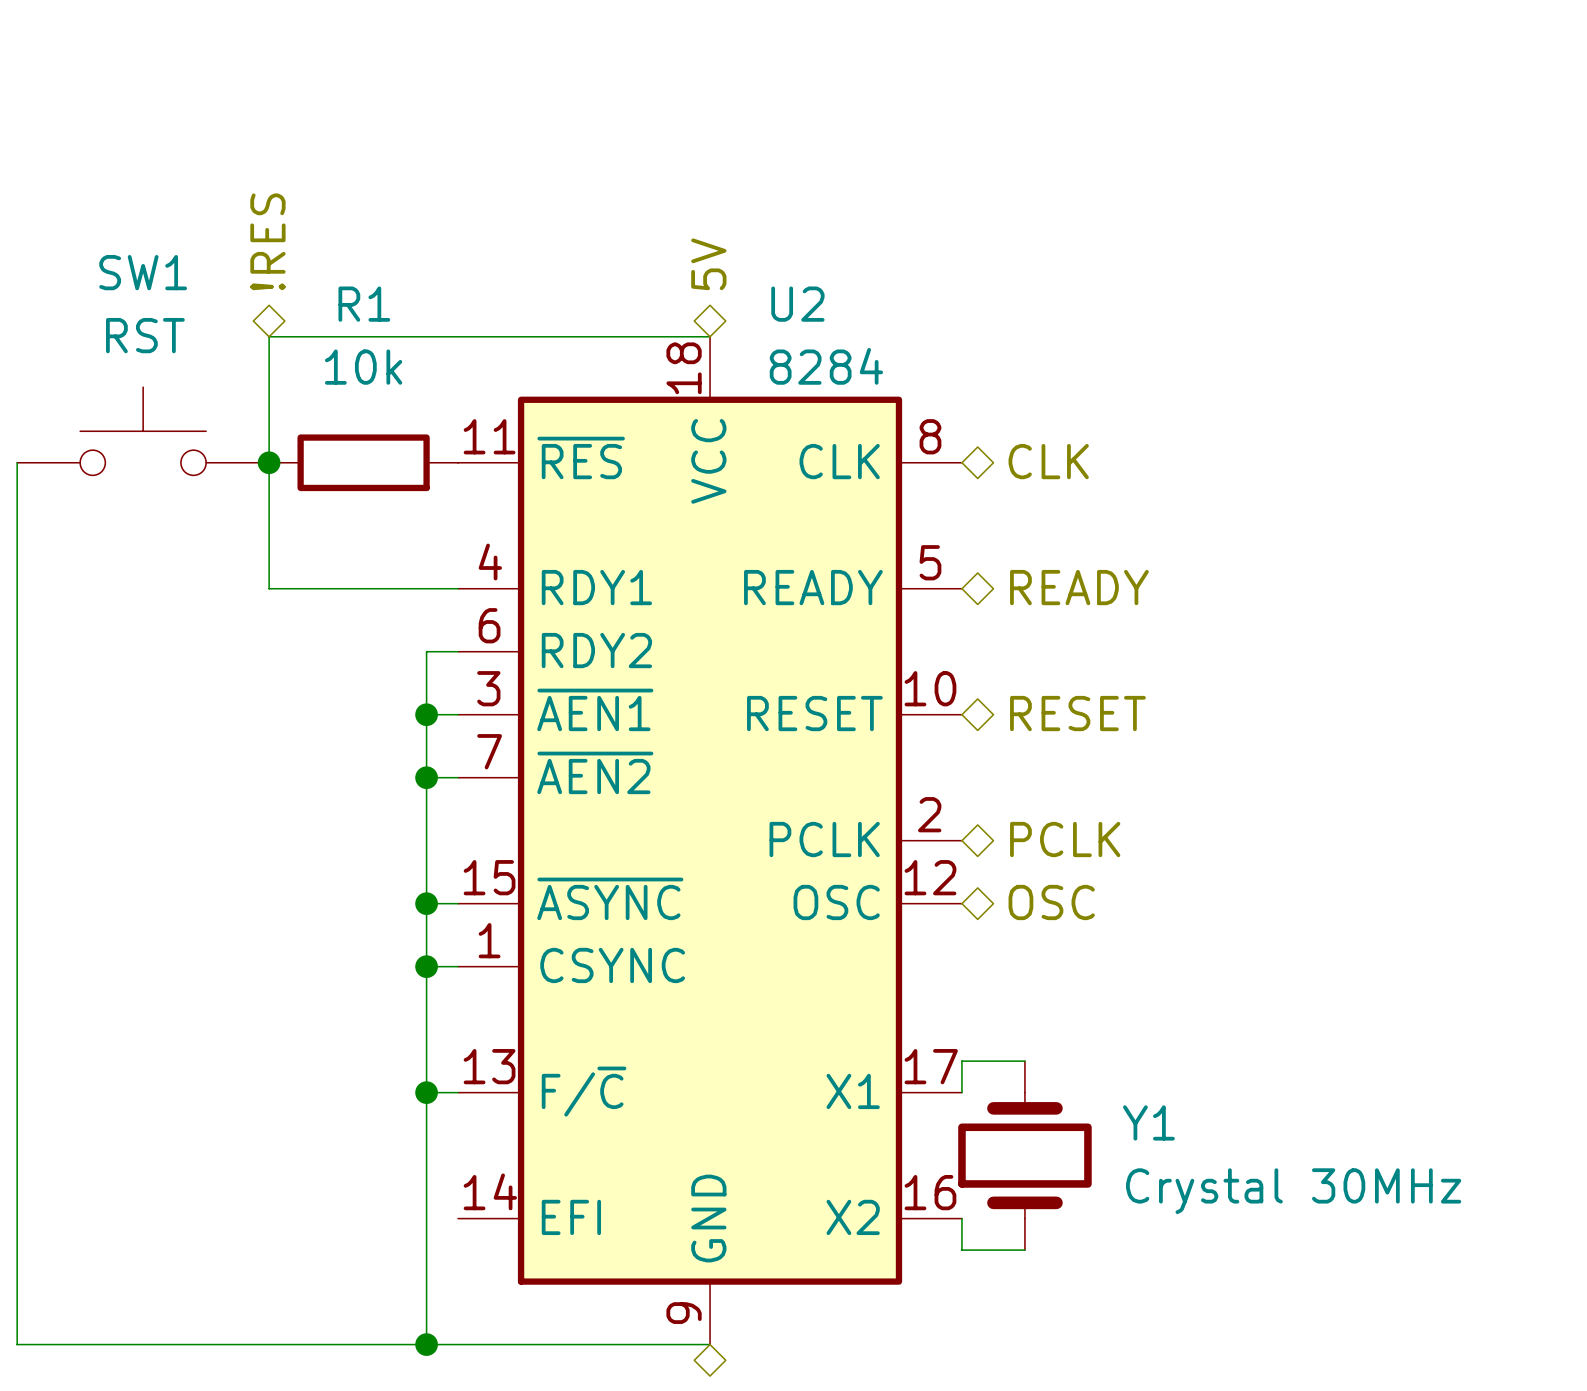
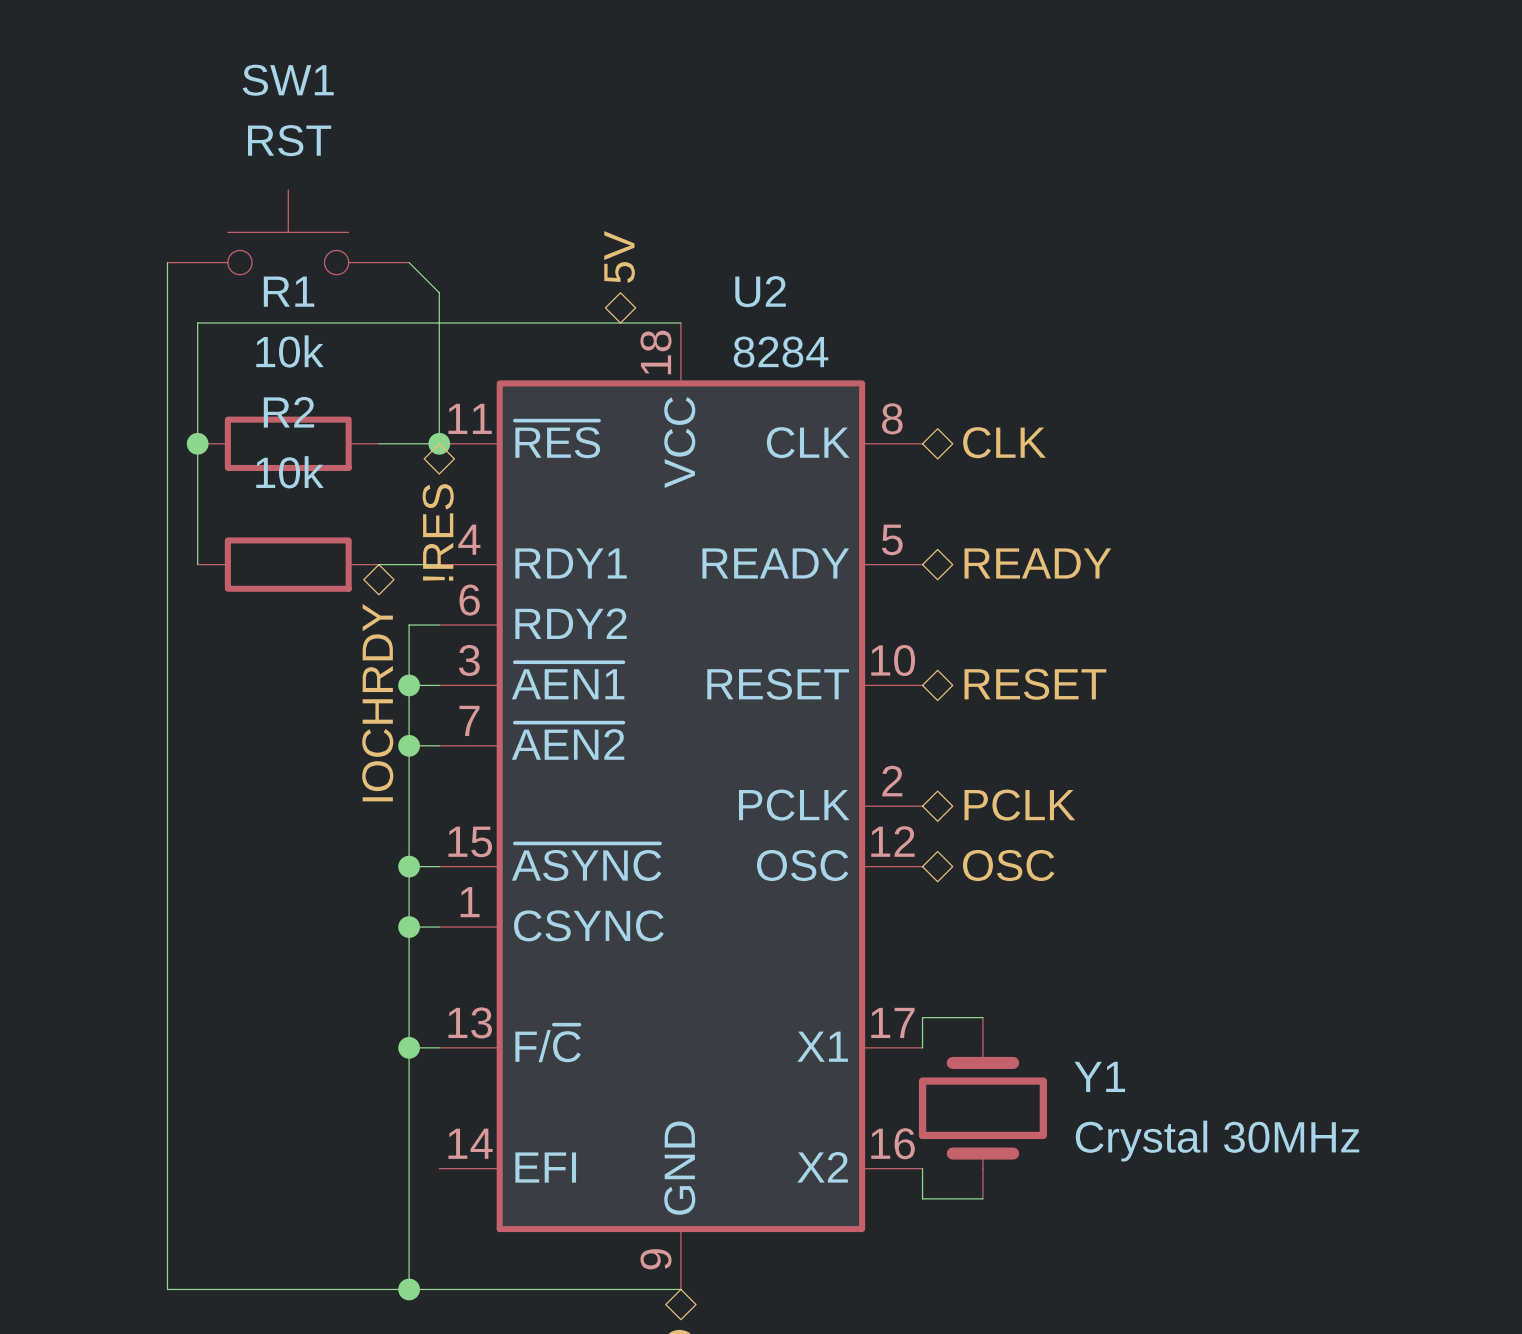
hierarchical label rotation: 0° (267, 241) -> 180° (438, 532)
hierarchical label position: !RES (267, 241) -> !RES (438, 532)
hierarchical label position: 5V (708, 264) -> 5V (619, 257)
wire: none -> (409, 262) (439, 292) (439, 443) (378, 443)
wire: (269, 336) (269, 588) (395, 588) -> (258, 322) (197, 322) (197, 564)
SW1 position: (143, 431) -> (288, 232)
wire: (17, 462) (17, 1344) (174, 1344) -> (167, 262) (167, 1289)
junction position: (269, 462) -> (197, 443)
R1 position: (363, 462) -> (288, 443)
junction: none -> (439, 443)
R2: none -> 10k (288, 564)
hierarchical label: none -> IOCHRDY (377, 702)

